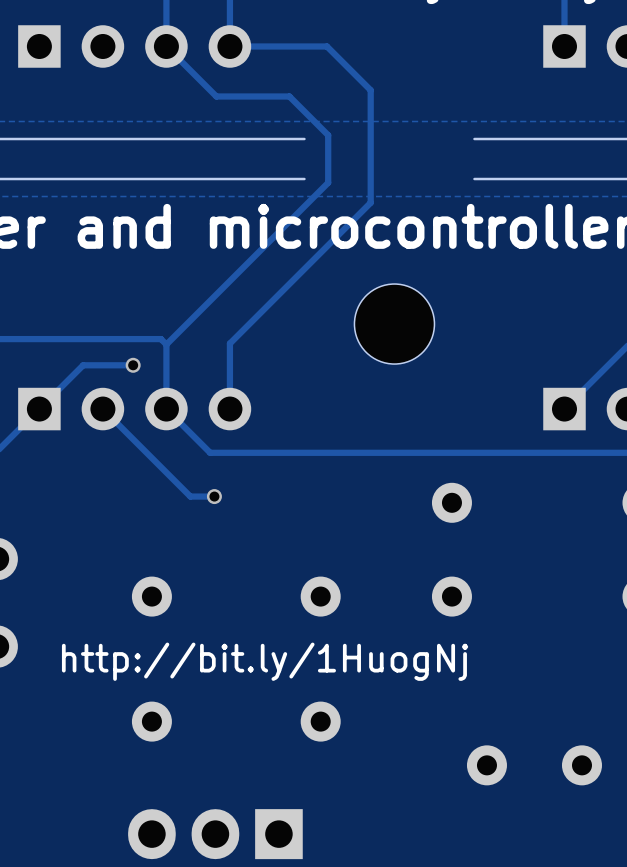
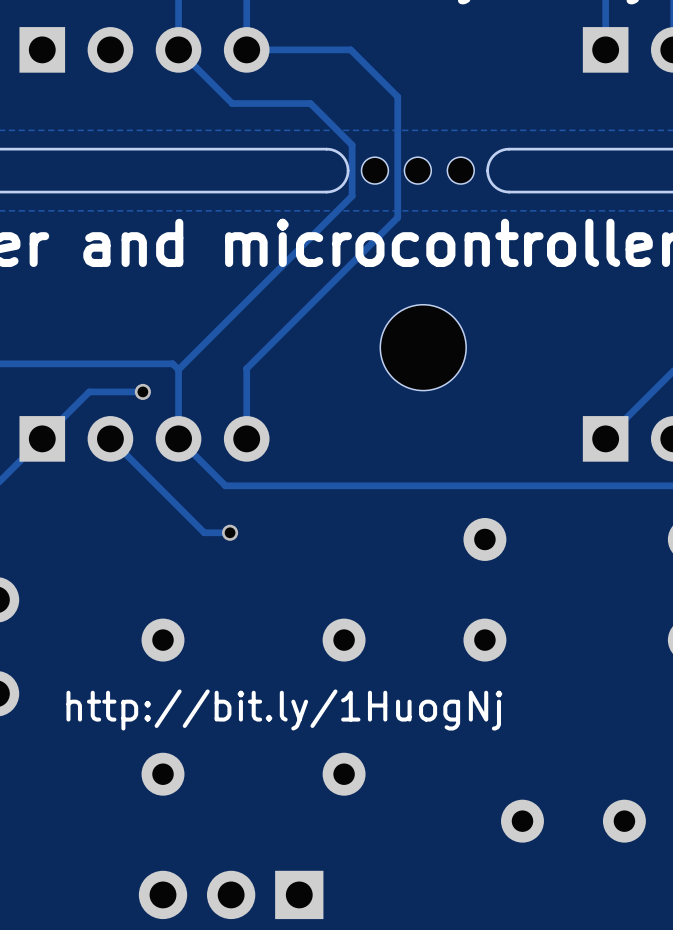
part: none -> (417, 170)
part footprint: [128, 809, 303, 860] -> [138, 870, 324, 920]

